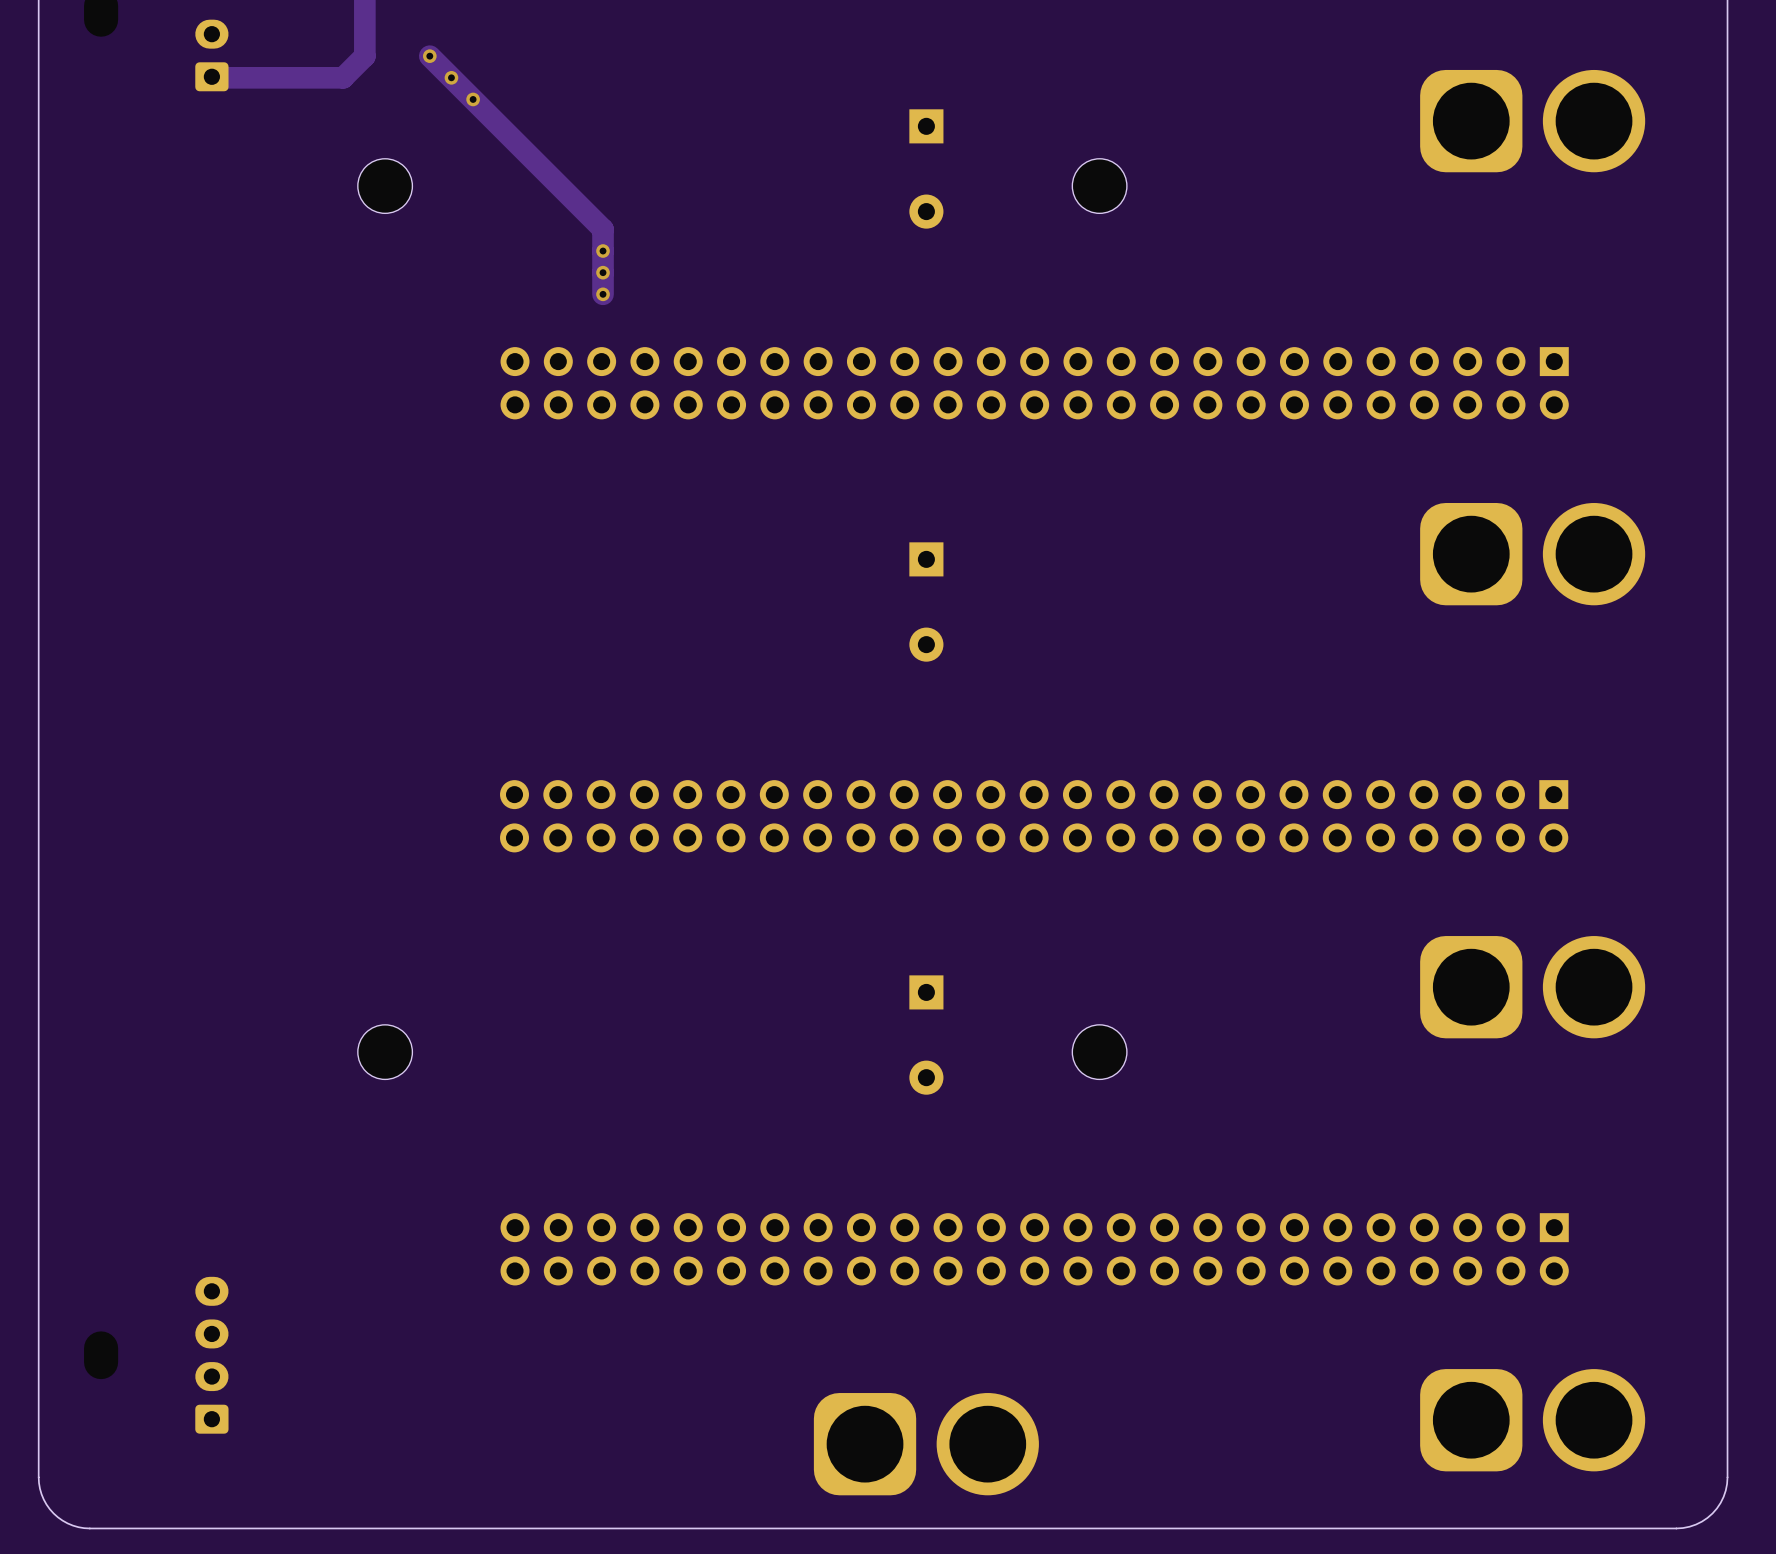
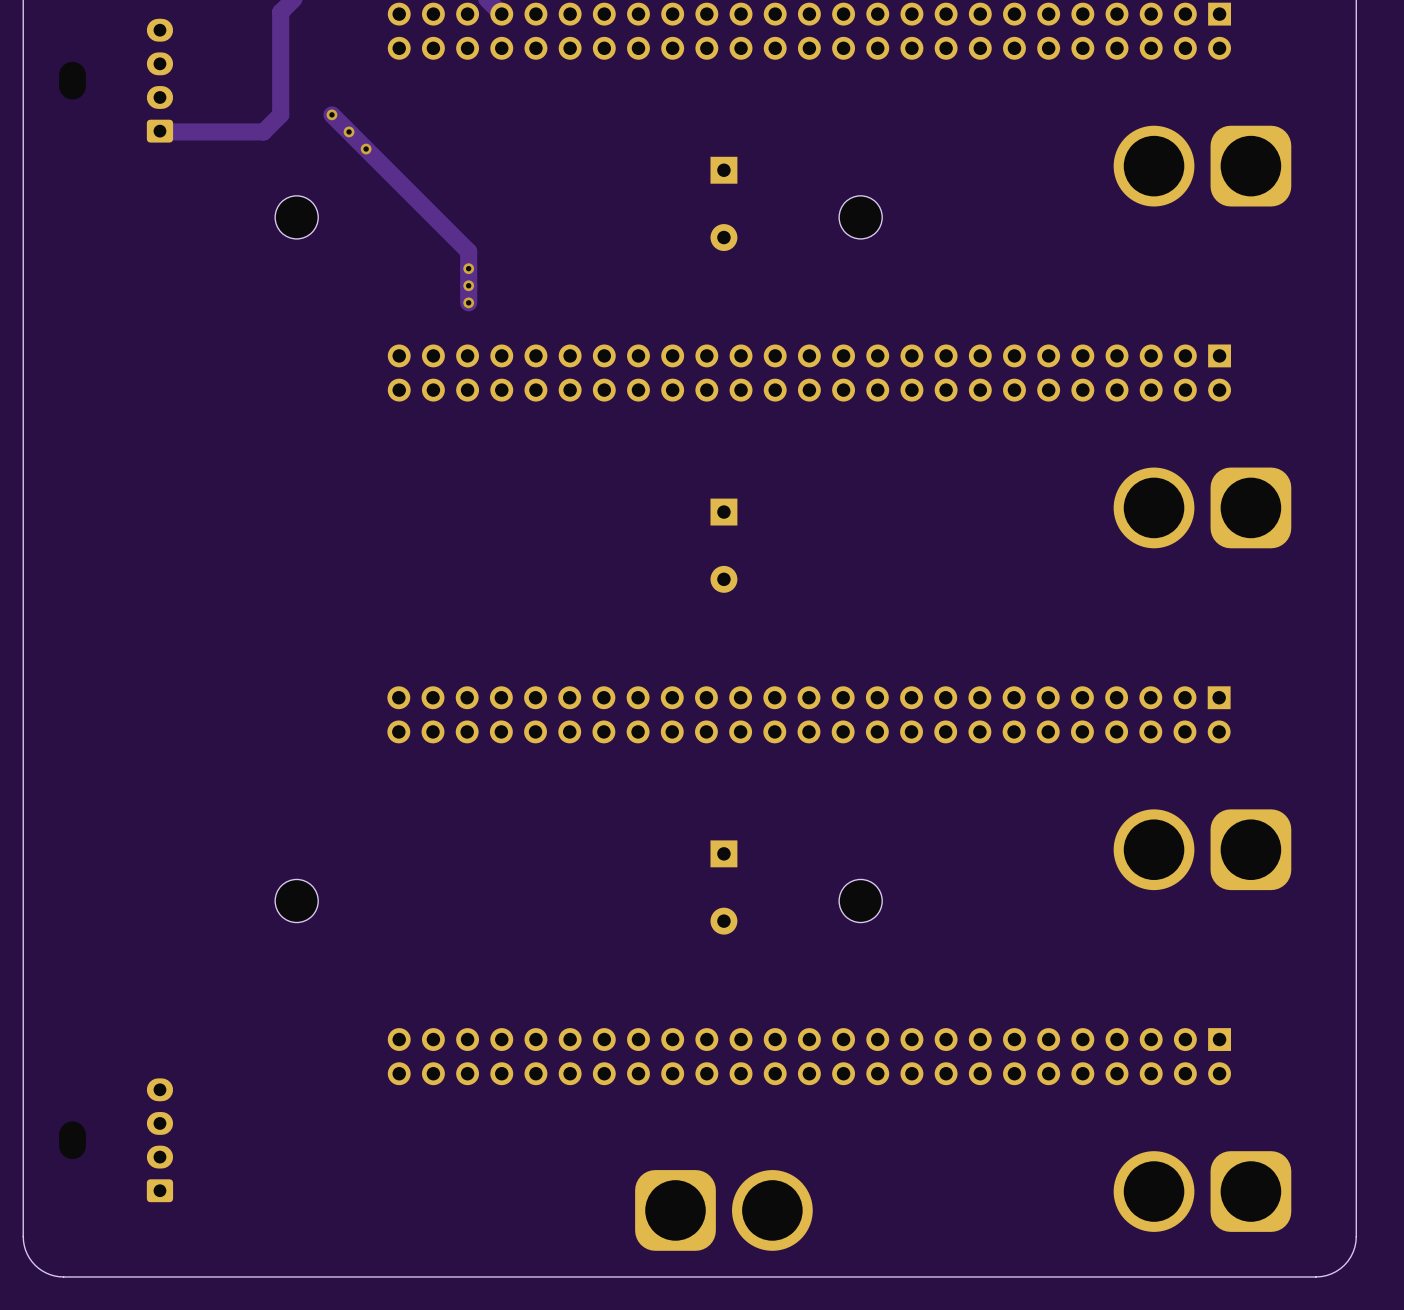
part rotation: 0° (1532, 121) -> 180° (1202, 166)
part rotation: 0° (1532, 554) -> 180° (1202, 507)
part rotation: 0° (1532, 987) -> 180° (1202, 849)
part rotation: 0° (1532, 1420) -> 180° (1202, 1191)

